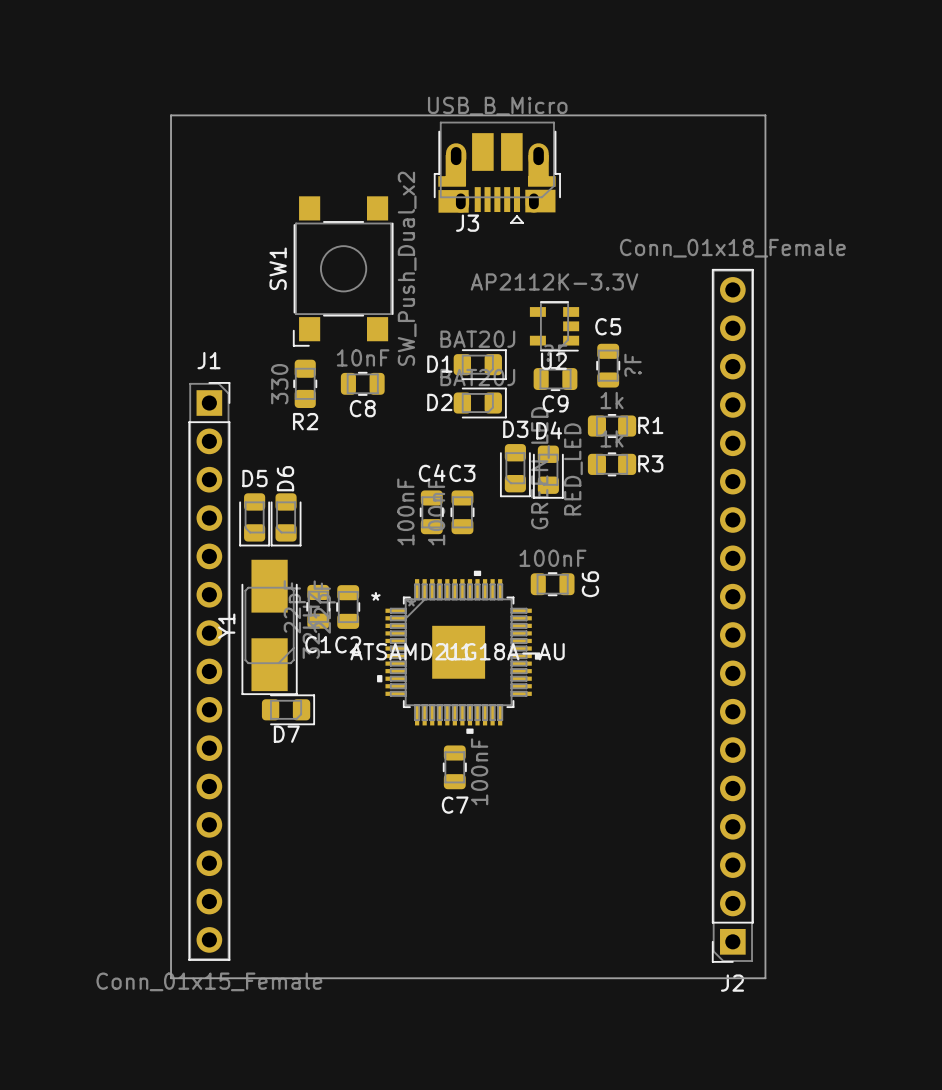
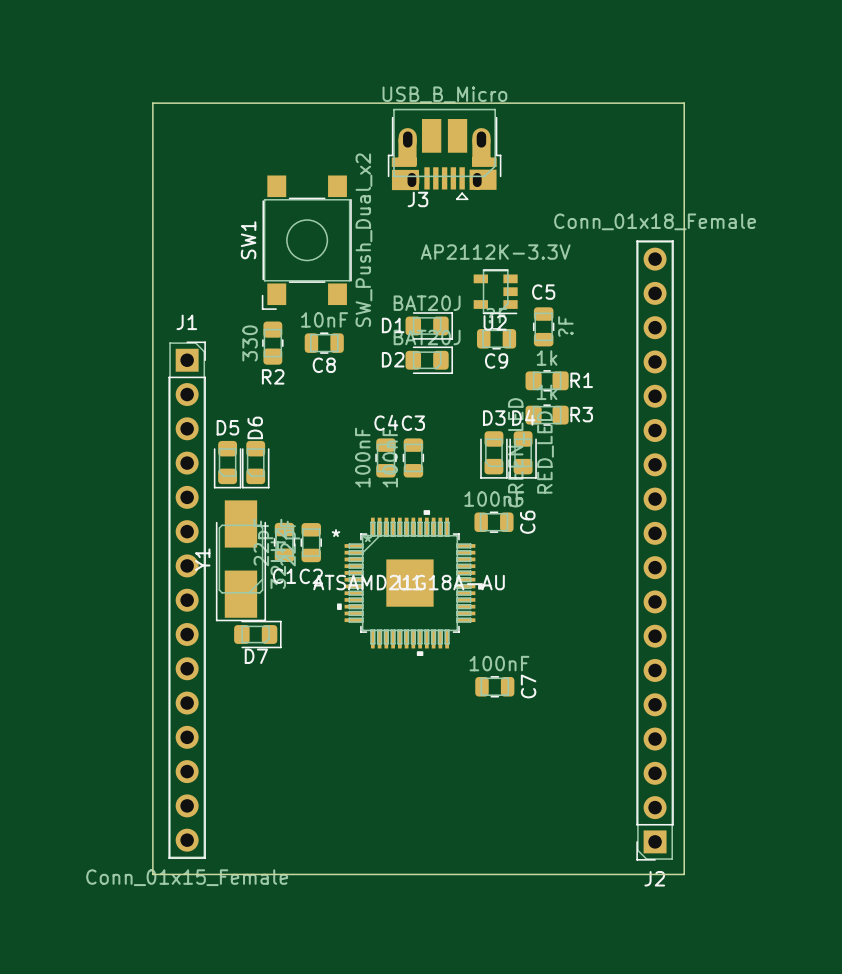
D3 position: (515, 470) -> (493, 454)
D4 position: (548, 472) -> (523, 454)
C7 rotation: 0° (454, 767) -> 90° clockwise (494, 686)
C7 position: (454, 767) -> (494, 686)
C7 value position: 100nF (479, 771) -> 100nF (499, 663)
C7 name position: C7 (455, 805) -> C7 (528, 686)

